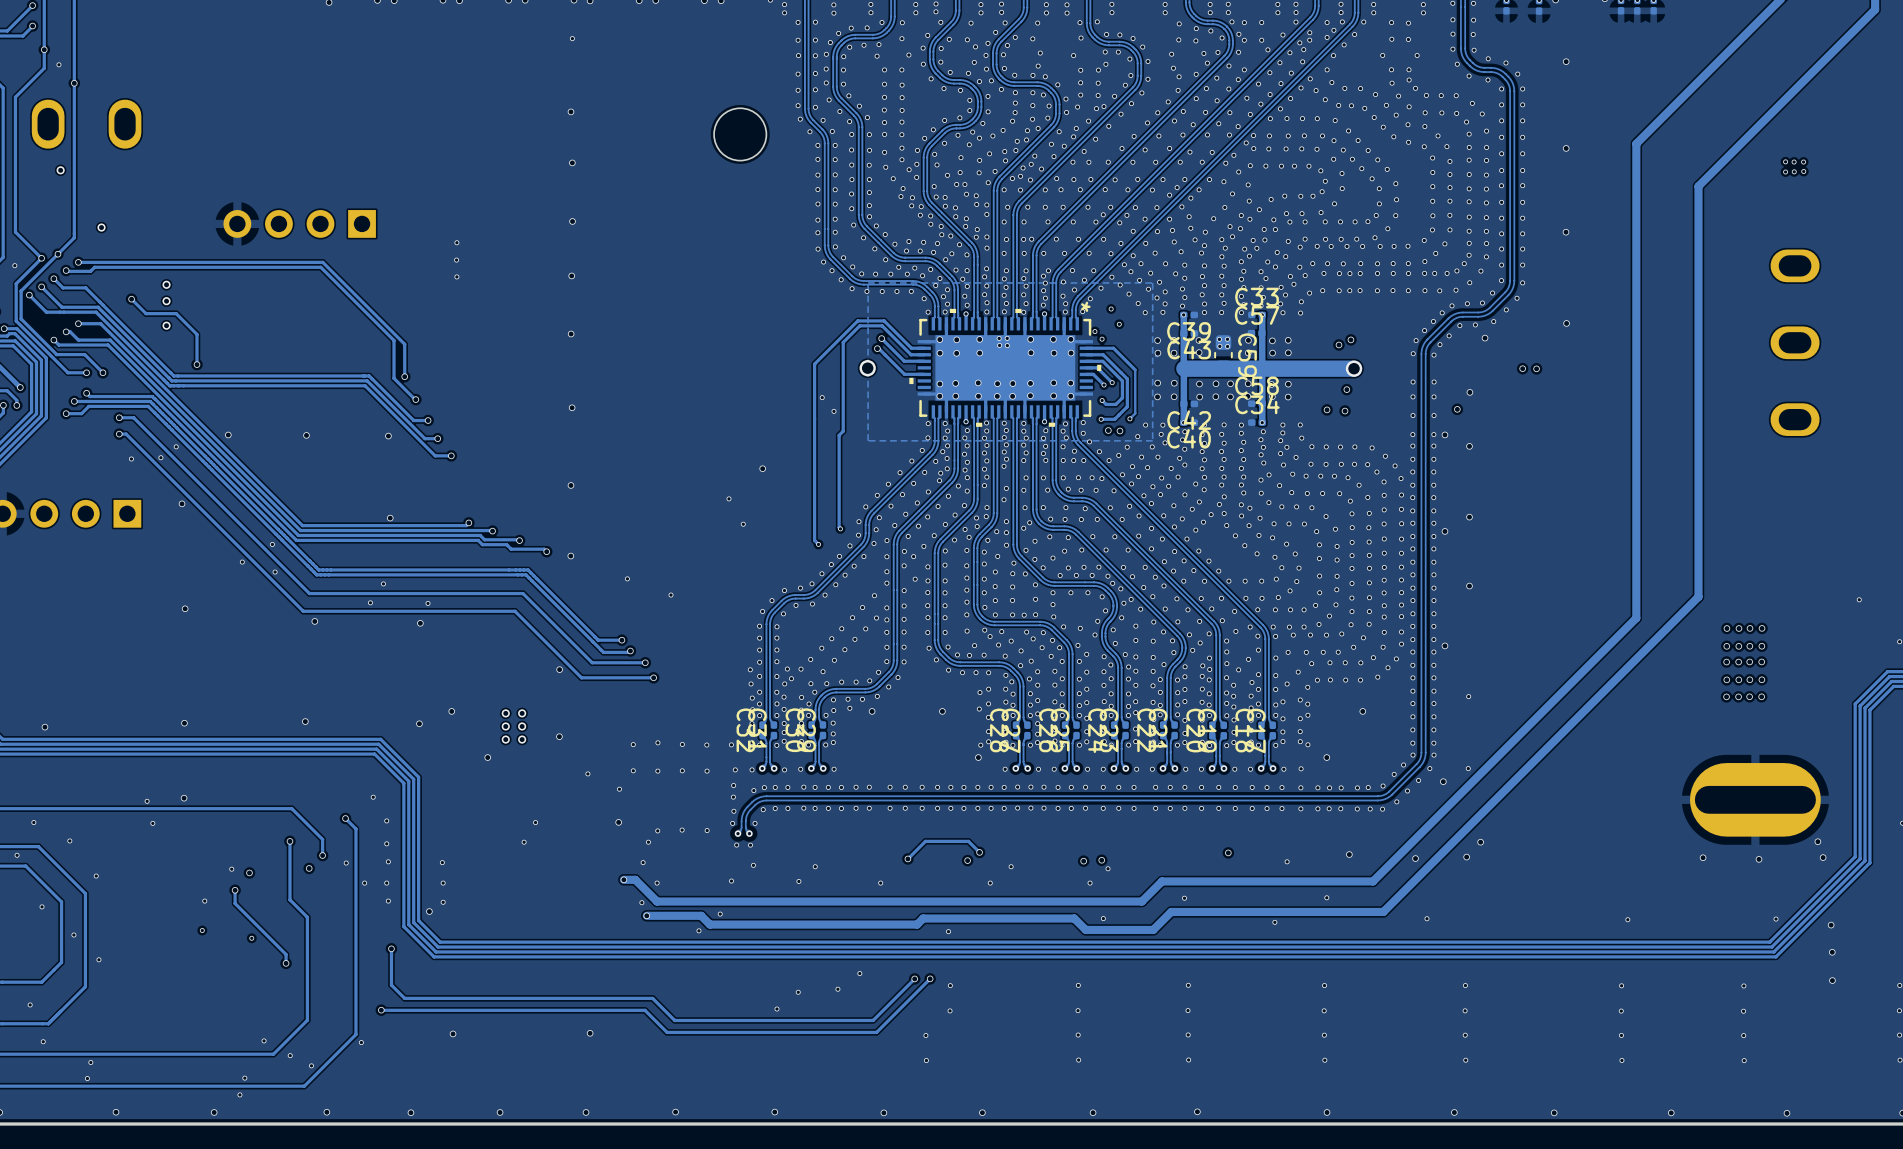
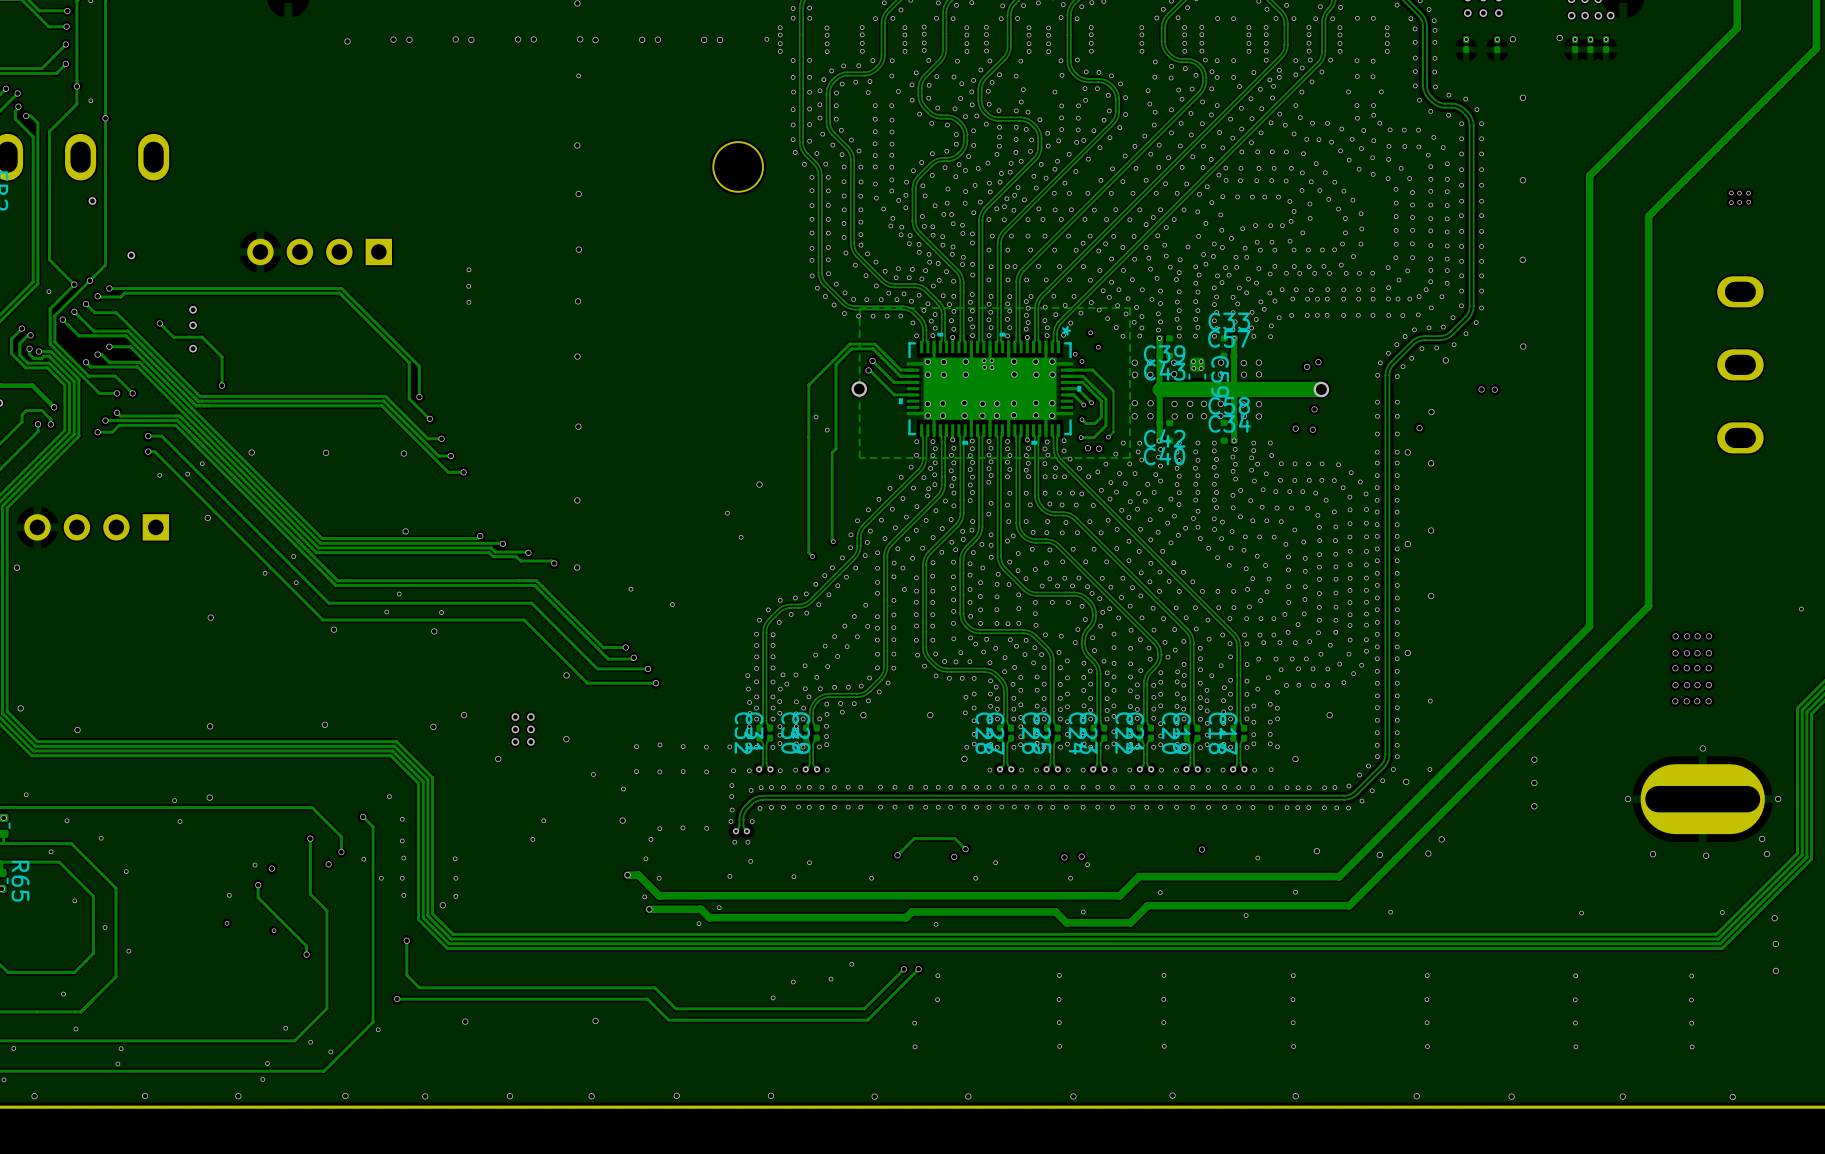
via: none -> (1702, 748)
via: none -> (1534, 759)
via: none -> (1534, 782)
via: none -> (1627, 799)
via: none -> (1778, 799)
via: none -> (1534, 806)

